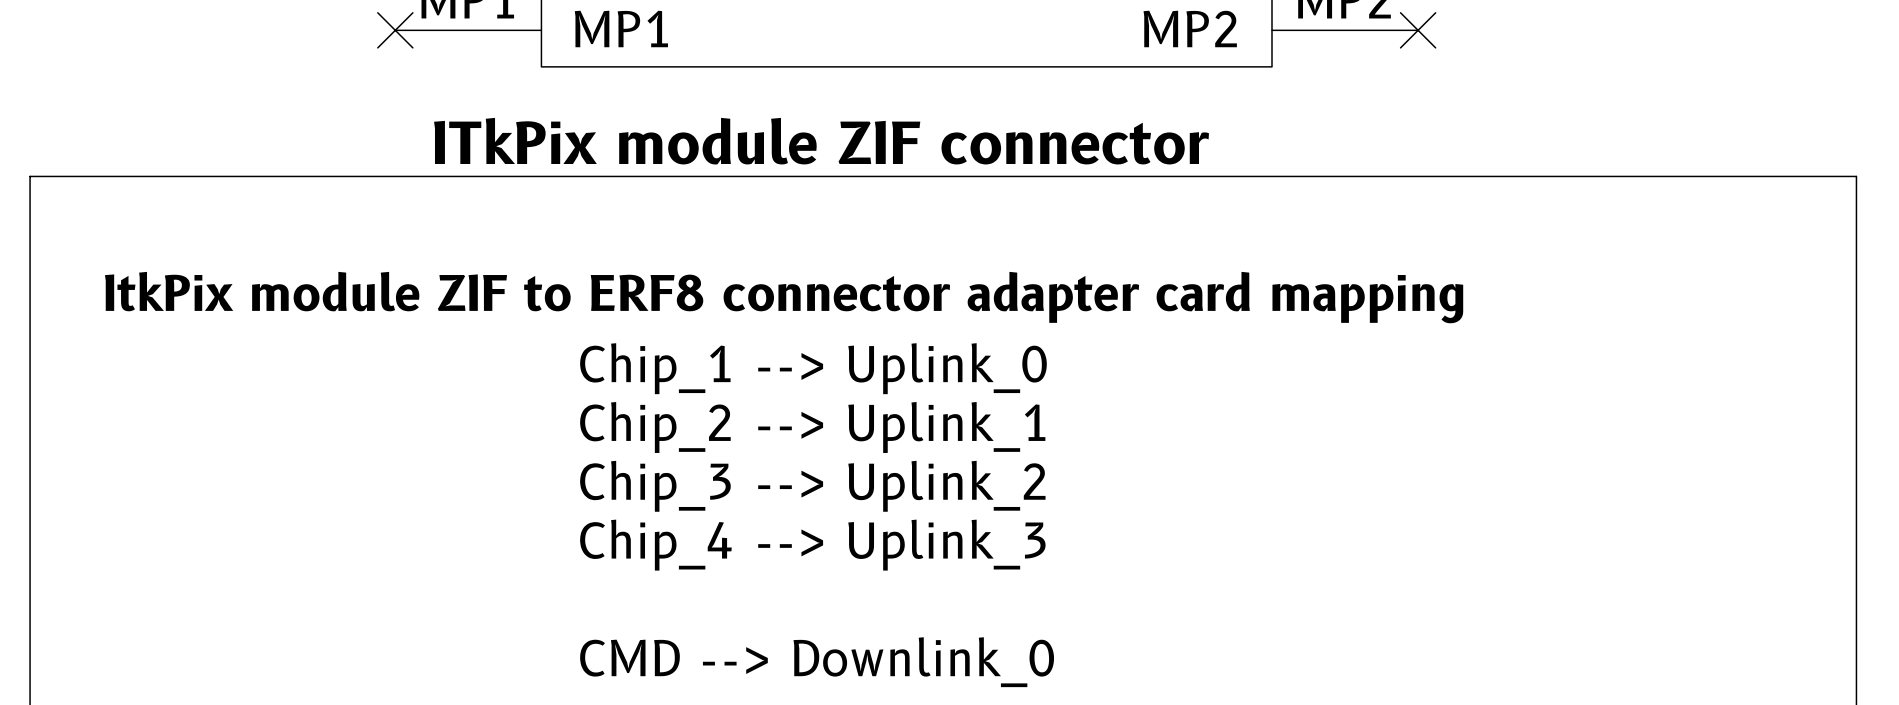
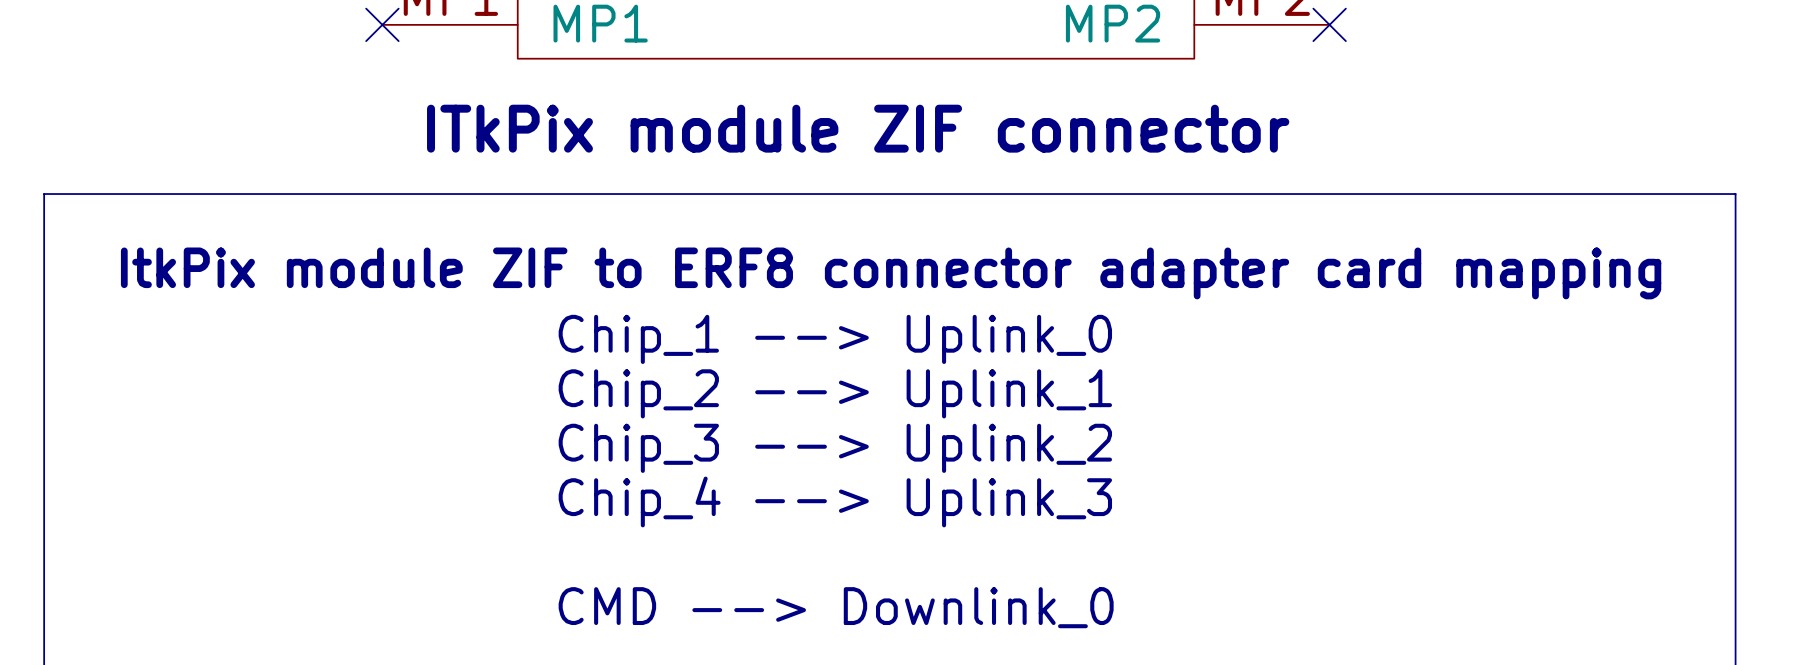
line: (30, 212) (30, 176) (1856, 176) (1856, 212) -> (44, 194) (1735, 194)

